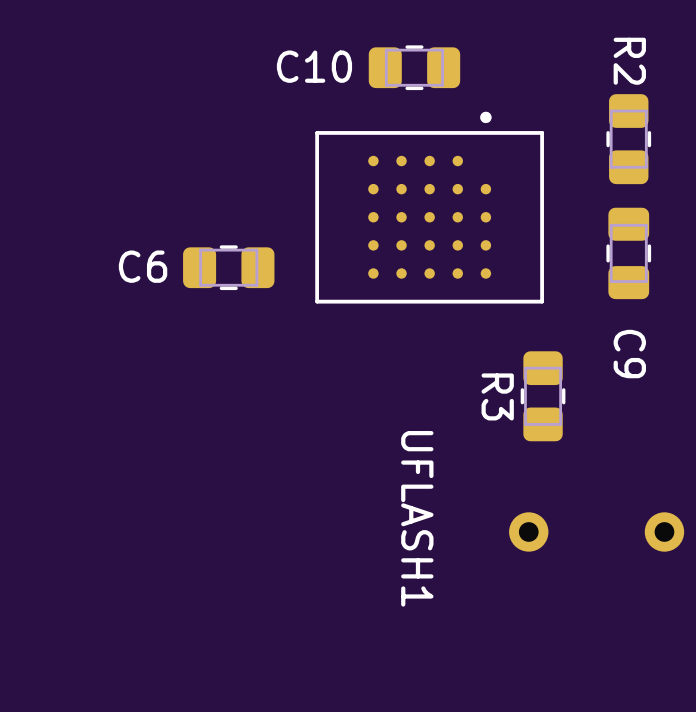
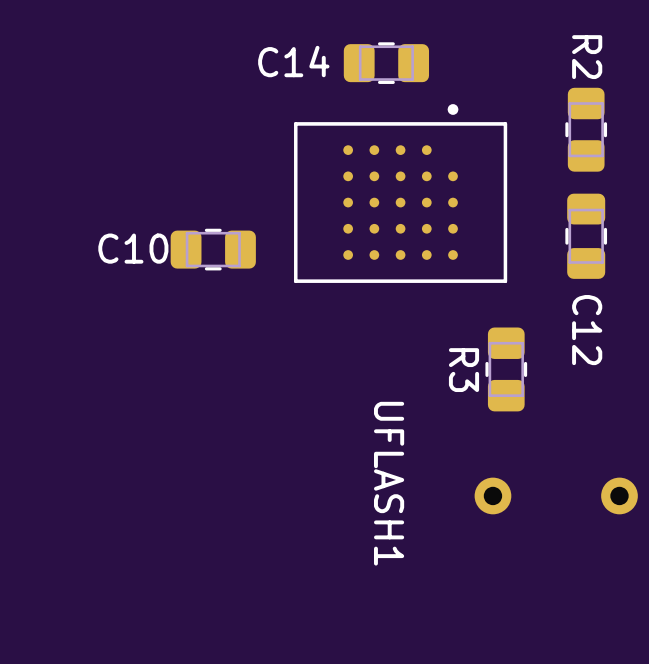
C10 name: C10 (314, 66) -> C14 (293, 61)
C6 name: C6 (143, 266) -> C10 (133, 248)
C9 name: C9 (629, 354) -> C12 (587, 330)

